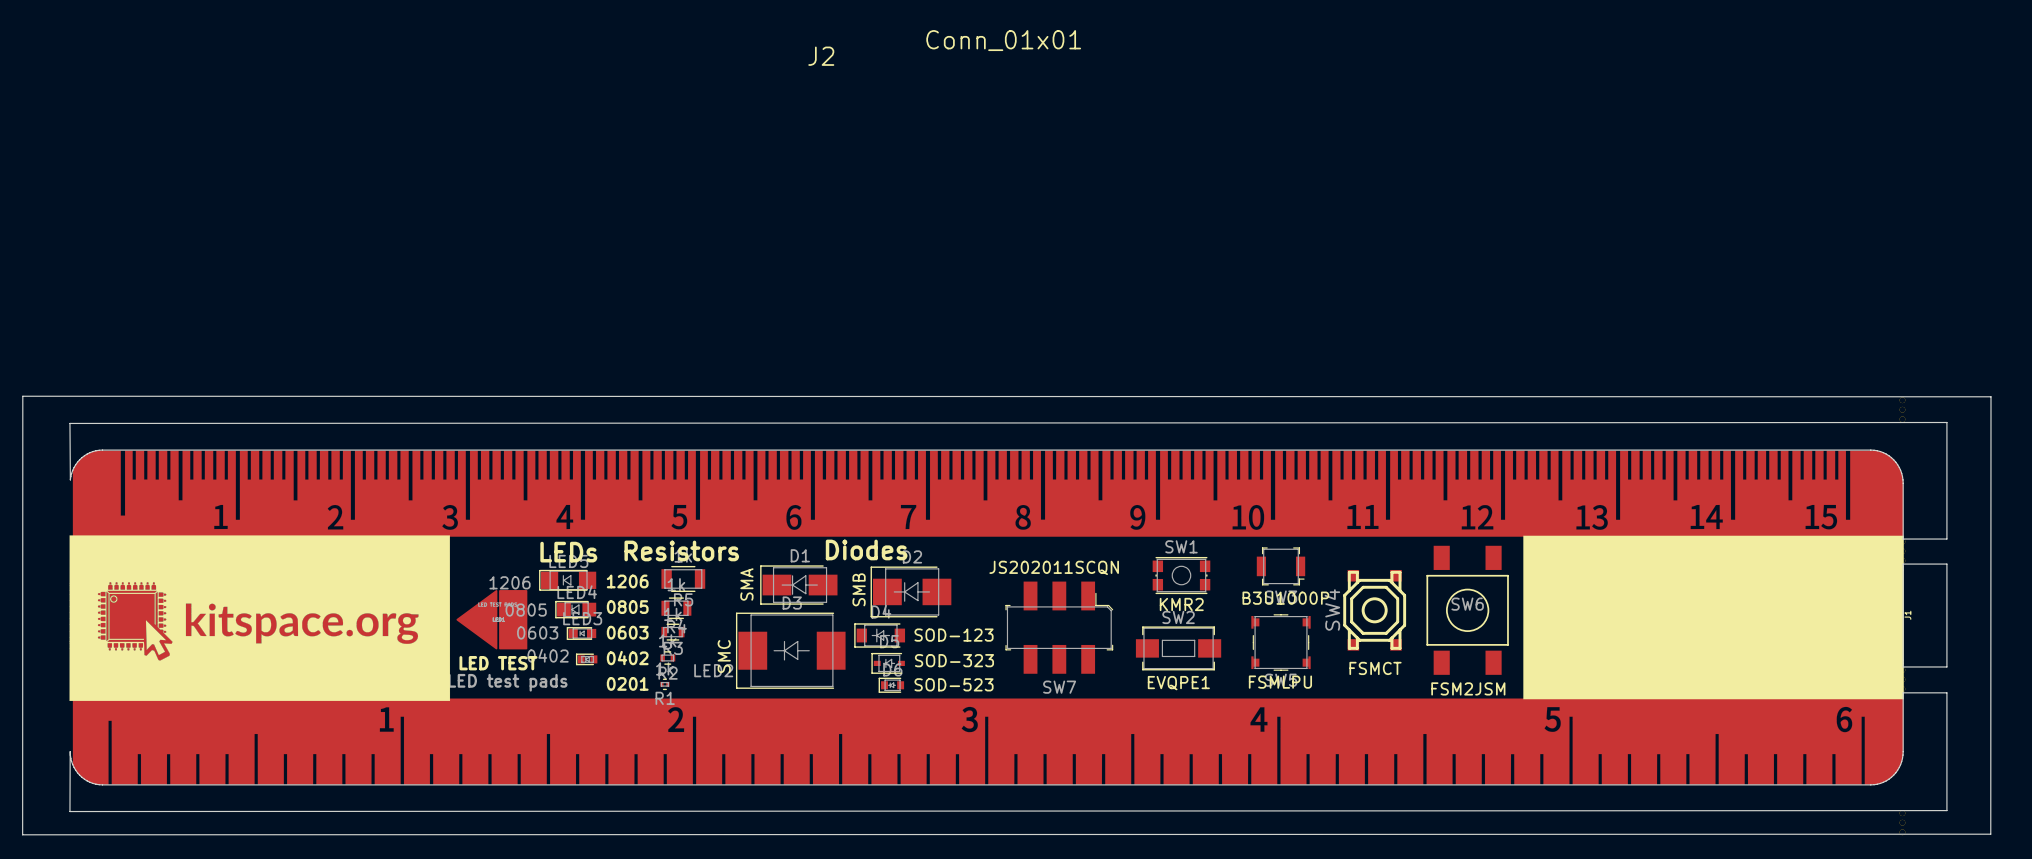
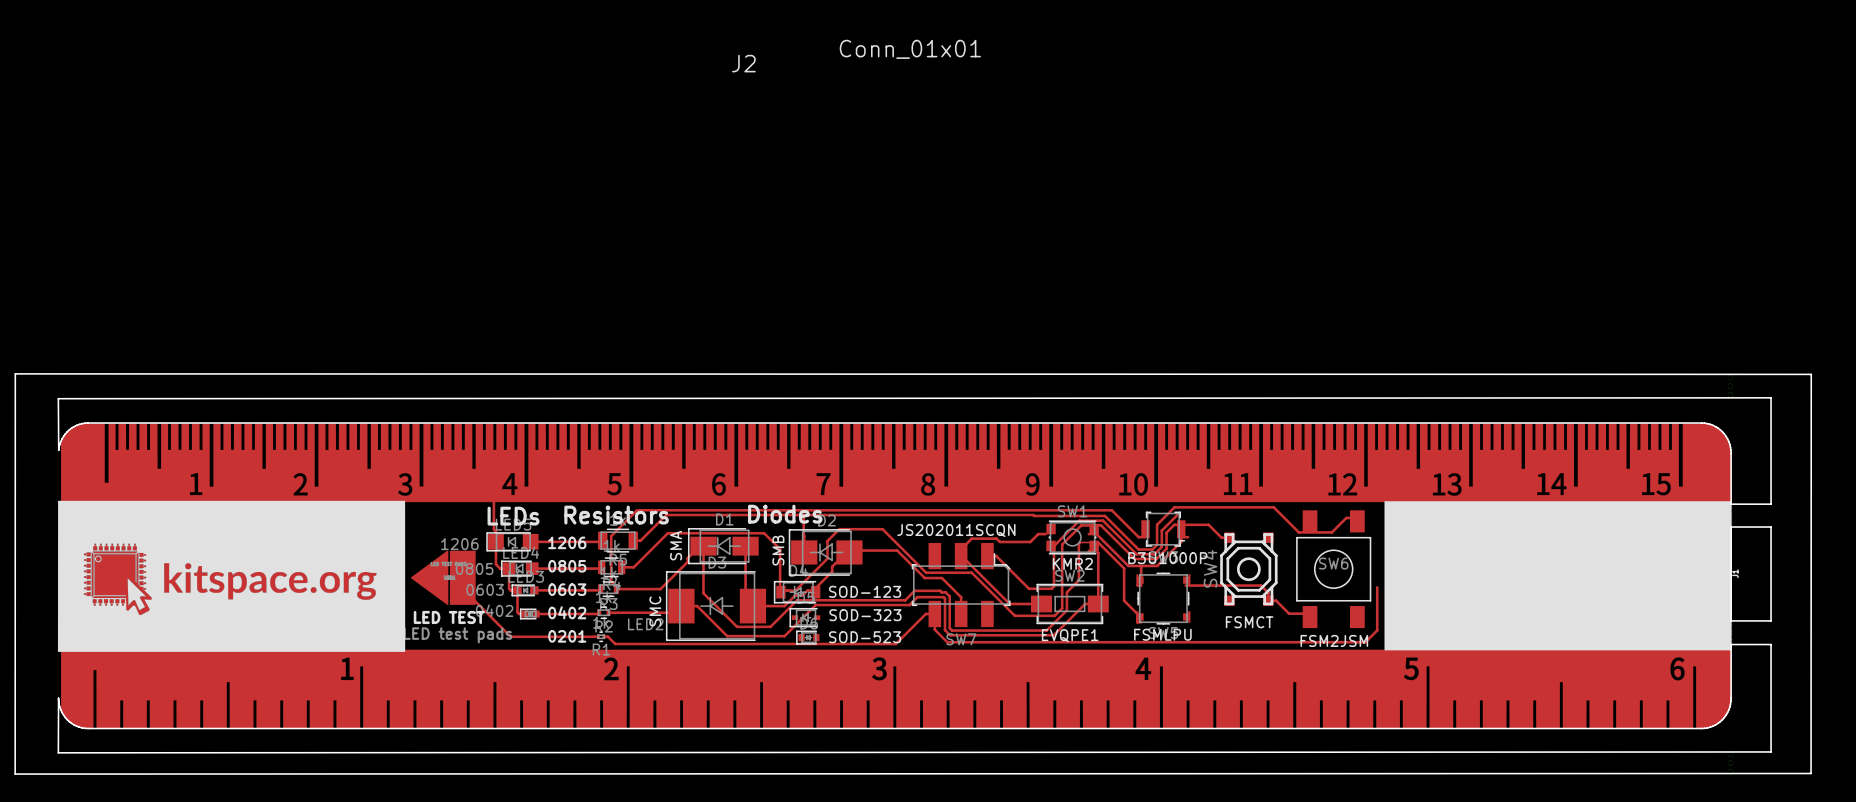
track: none -> (495, 499) (493, 529) (495, 531) (495, 564) (500, 568) (509, 568) (509, 588) (517, 590) (517, 612) (524, 614)
track: none -> (803, 515) (805, 550)
track: none -> (1177, 515) (1161, 530) (1161, 546) (1154, 554) (1136, 554) (1103, 520) (1079, 520) (1053, 546) (1053, 586) (1051, 588) (1028, 588) (996, 556) (987, 556)
track: none -> (1356, 517) (1346, 517) (1331, 532) (1298, 532) (1273, 507) (1174, 507) (1157, 524) (1157, 544) (1152, 549) (1138, 549) (1105, 515) (666, 515) (640, 540) (633, 540)
track: none -> (1045, 534) (1038, 534) (1030, 541) (999, 541) (996, 538) (971, 538) (961, 549) (961, 556) (1009, 603) (1041, 603)
track: none -> (1088, 534) (1096, 534) (1128, 565) (1157, 565) (1181, 541) (1181, 537) (1188, 537)
track: none -> (1145, 537) (1138, 537) (1111, 510) (637, 510) (611, 536) (611, 581) (616, 589) (660, 589) (687, 561) (687, 558) (699, 546) (703, 546) (703, 593) (737, 626) (770, 626) (797, 600) (905, 600) (914, 590) (940, 590) (949, 596) (949, 628) (952, 630) (1046, 630) (1066, 610) (1066, 592) (1078, 580) (1078, 543) (1098, 542) (1124, 568) (1124, 600) (1137, 613) (1137, 622) (1141, 622)
track: none -> (1229, 537) (1221, 537) (1208, 524) (1174, 524) (1166, 532) (1166, 548) (1156, 558) (1134, 558) (1101, 525) (1081, 525) (1062, 544) (1062, 608) (1054, 615) (1014, 615) (971, 572) (926, 572) (882, 529) (839, 529) (827, 541) (827, 558) (795, 590) (780, 590) (780, 549) (764, 533) (667, 533) (633, 567) (621, 567)
track: none -> (602, 540) (530, 541)
track: none -> (745, 546) (745, 598) (752, 606) (784, 606) (795, 595) (802, 595) (807, 590) (814, 590) (832, 571) (832, 566) (848, 550) (897, 550) (924, 578) (941, 578) (961, 597) (961, 613)
track: none -> (1088, 550) (1096, 550) (1098, 553) (1098, 603) (1085, 603) (1053, 635) (950, 635) (945, 630) (943, 597) (917, 597) (909, 605) (815, 605) (784, 636) (727, 636) (697, 606) (681, 606) (674, 612) (608, 612)
track: none -> (1141, 565) (1141, 579)
track: none -> (601, 567) (532, 568)
track: none -> (458, 577) (458, 584) (510, 636) (598, 636)
track: none -> (1141, 579) (1141, 585) (1137, 585)
track: none -> (1185, 585) (1260, 585) (1268, 592) (1268, 600) (1276, 600) (1289, 613) (1308, 613)
track: none -> (1377, 587) (1377, 630) (1365, 642) (947, 642) (934, 629) (934, 613) (925, 613) (895, 644) (615, 644) (608, 636) (603, 636)
track: none -> (600, 589) (534, 590)
track: none -> (599, 612) (536, 614)

